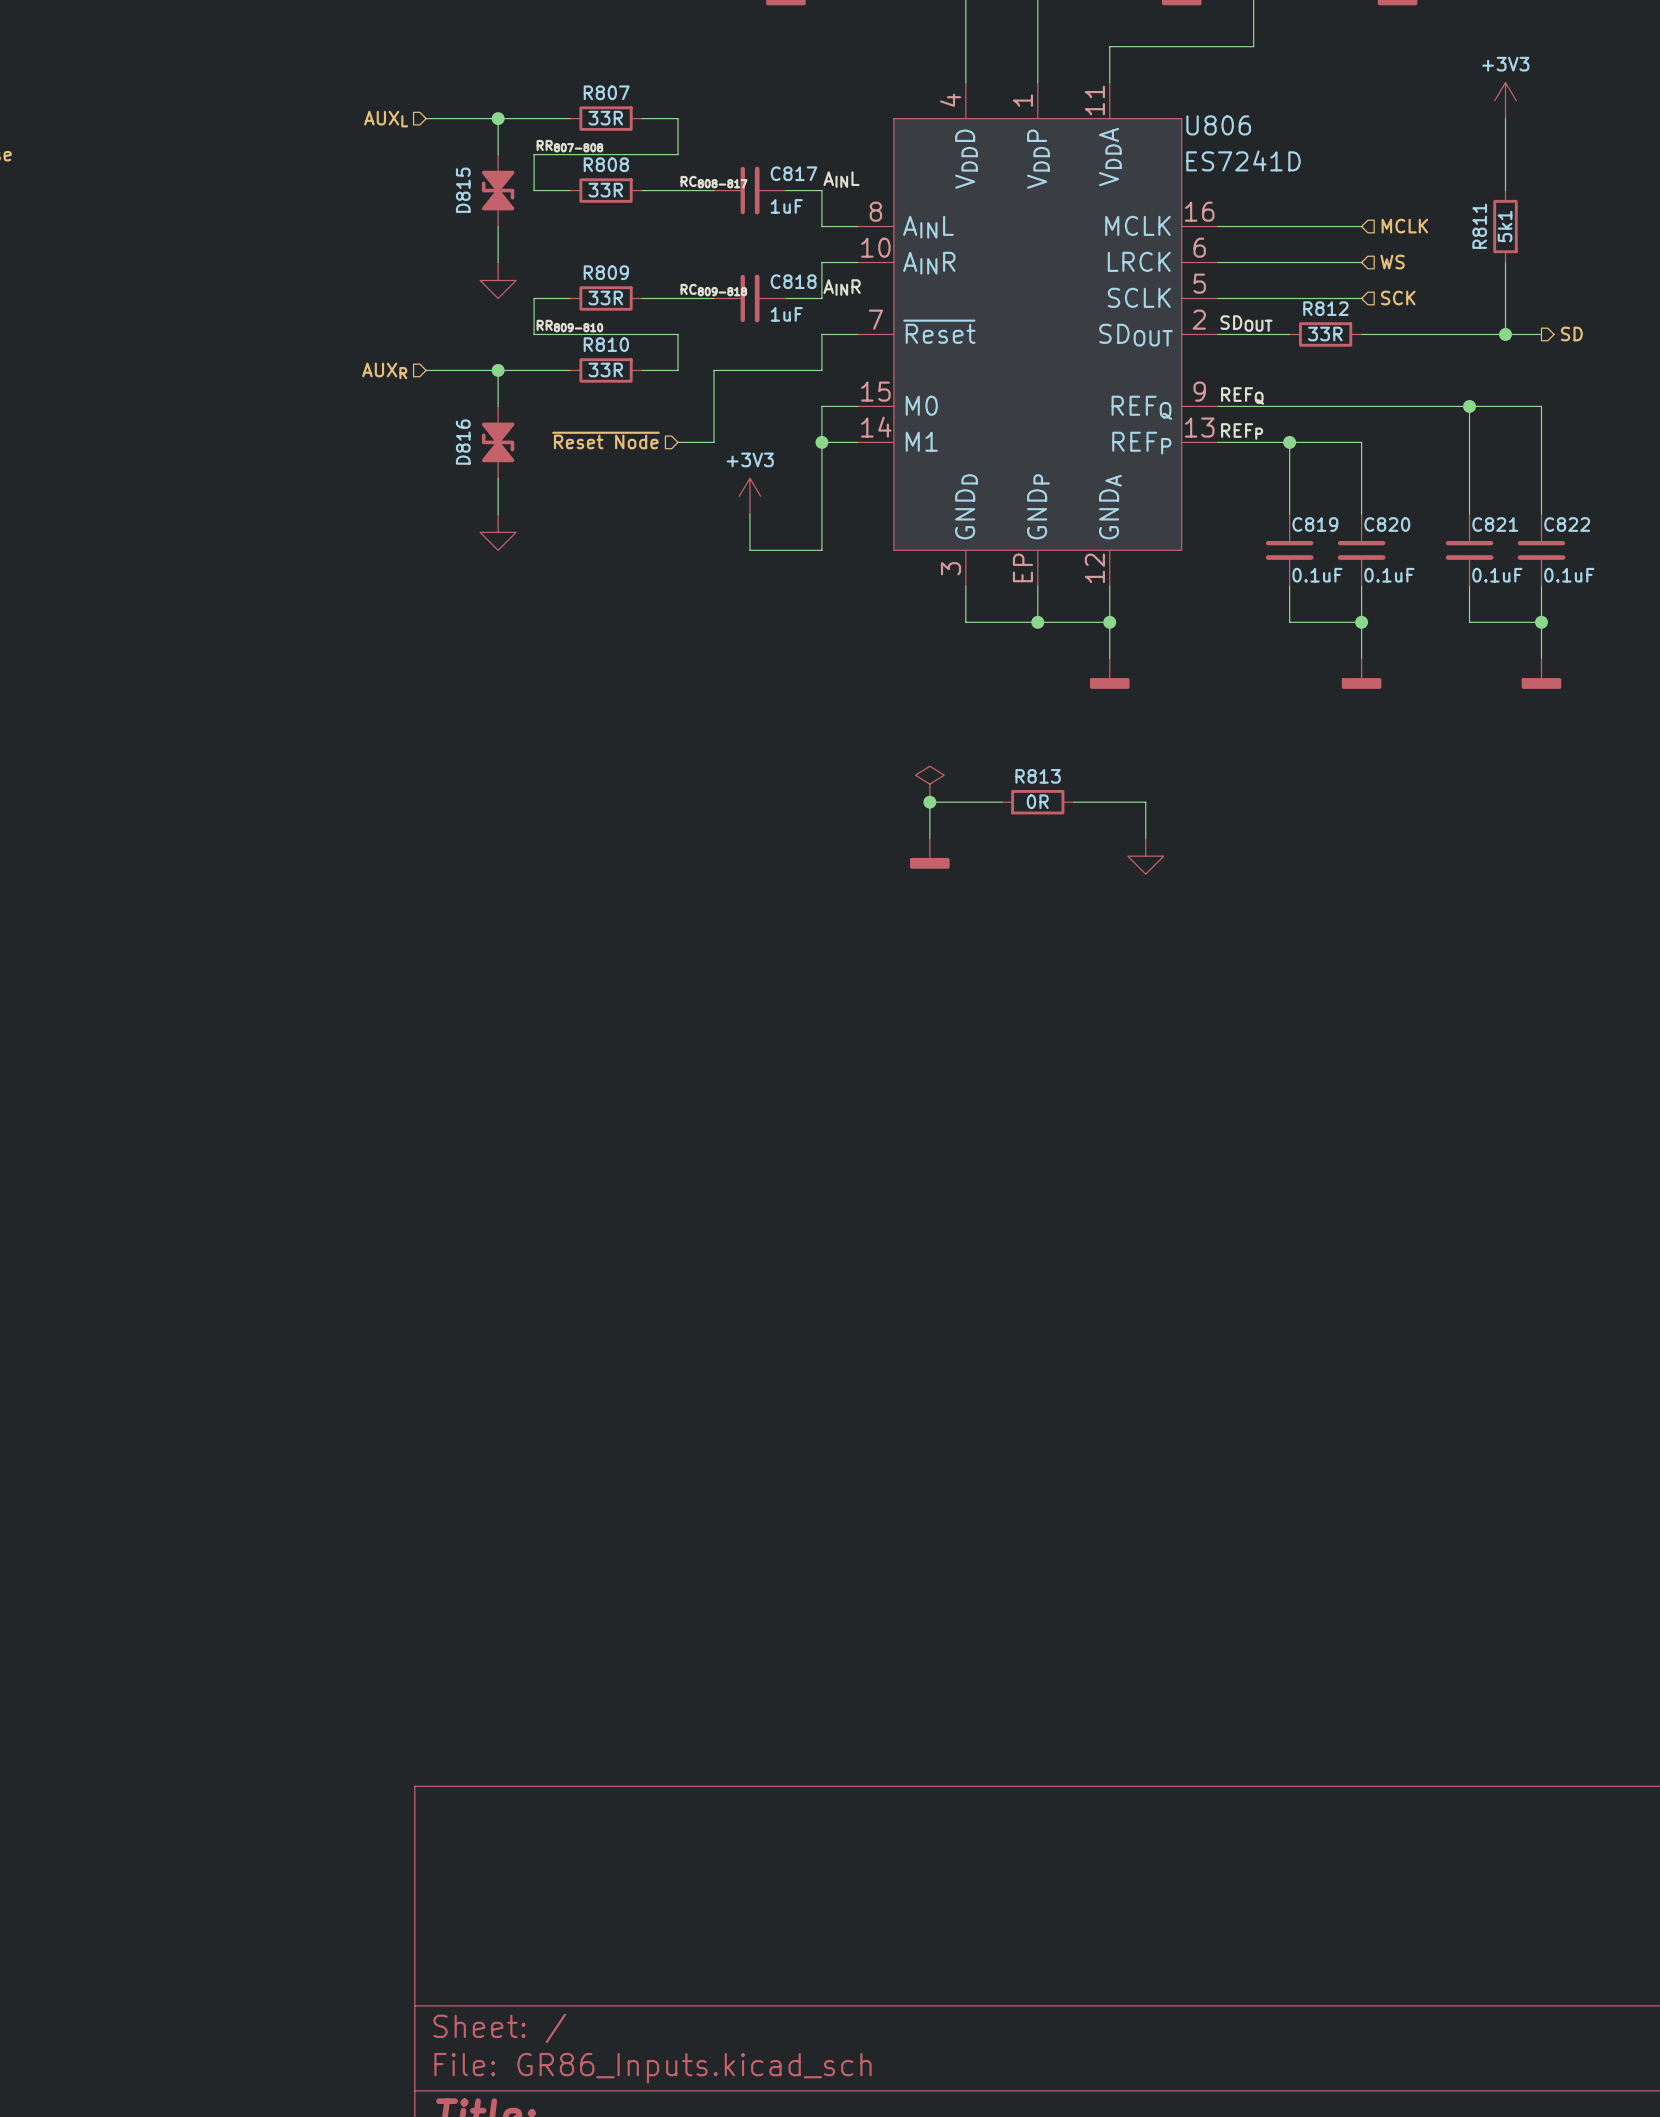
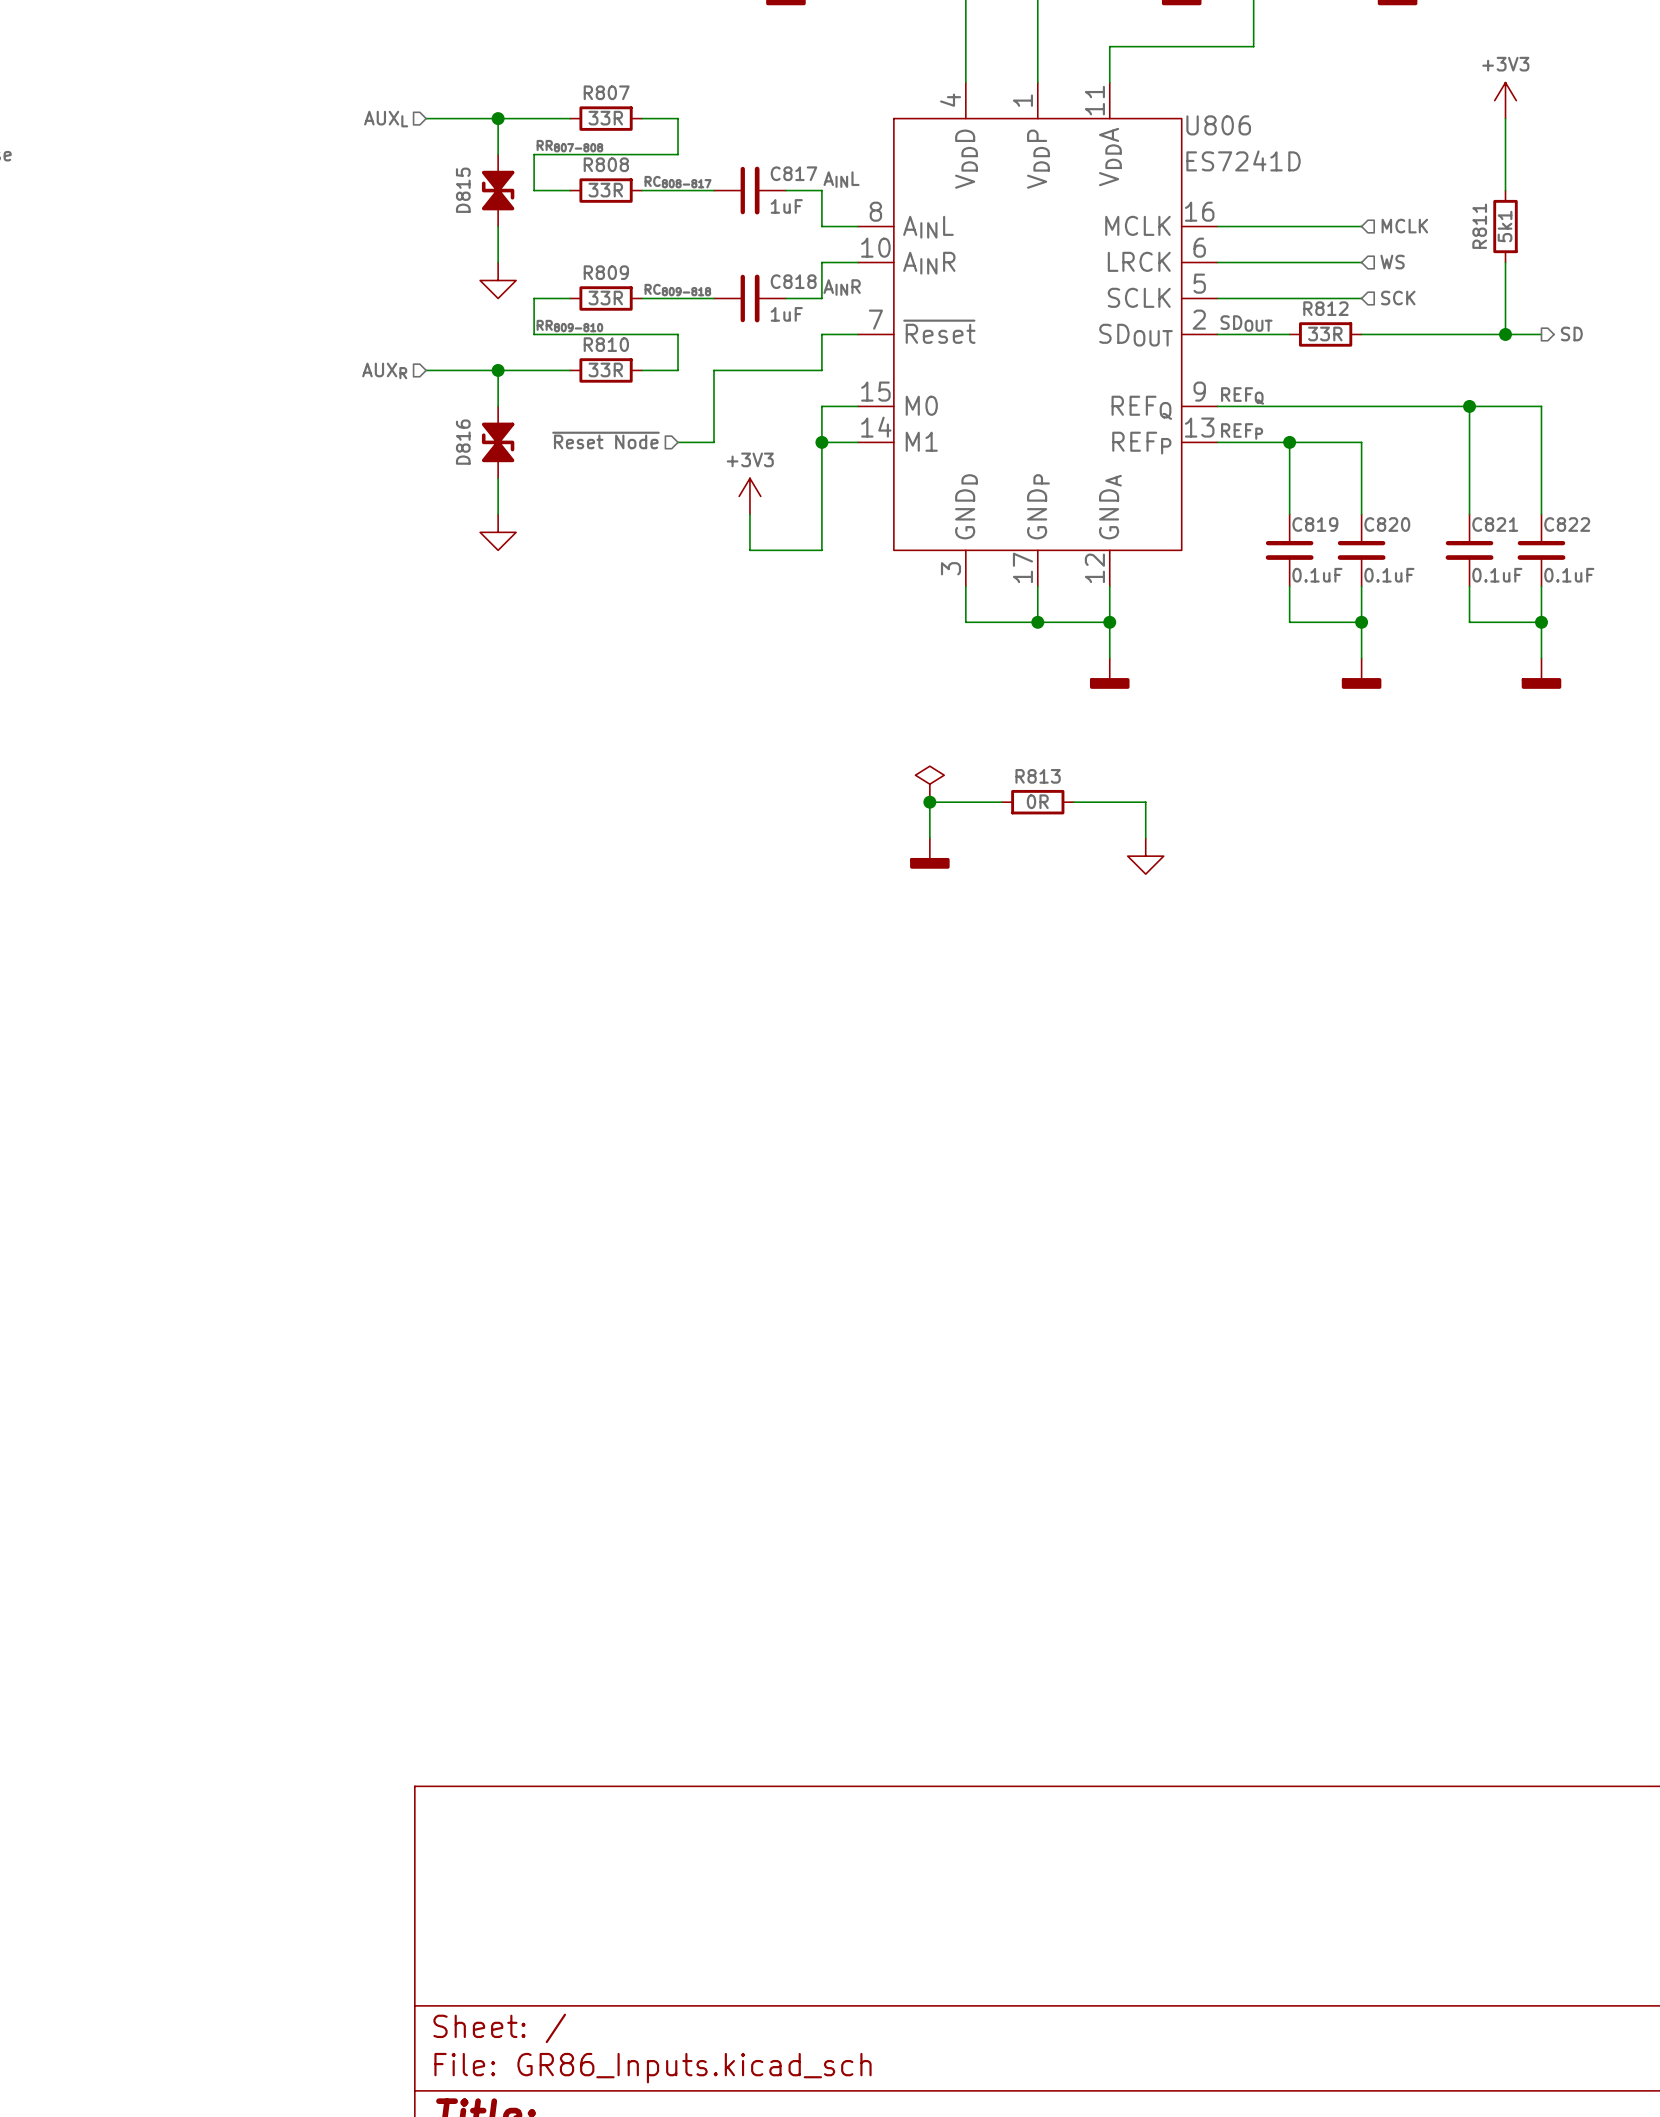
label position: RC808-817 (713, 182) -> RC808-817 (678, 182)
label position: RC809-818 (713, 290) -> RC809-818 (677, 290)
U806 pin number: EP (1022, 567) -> 17 (1022, 567)

